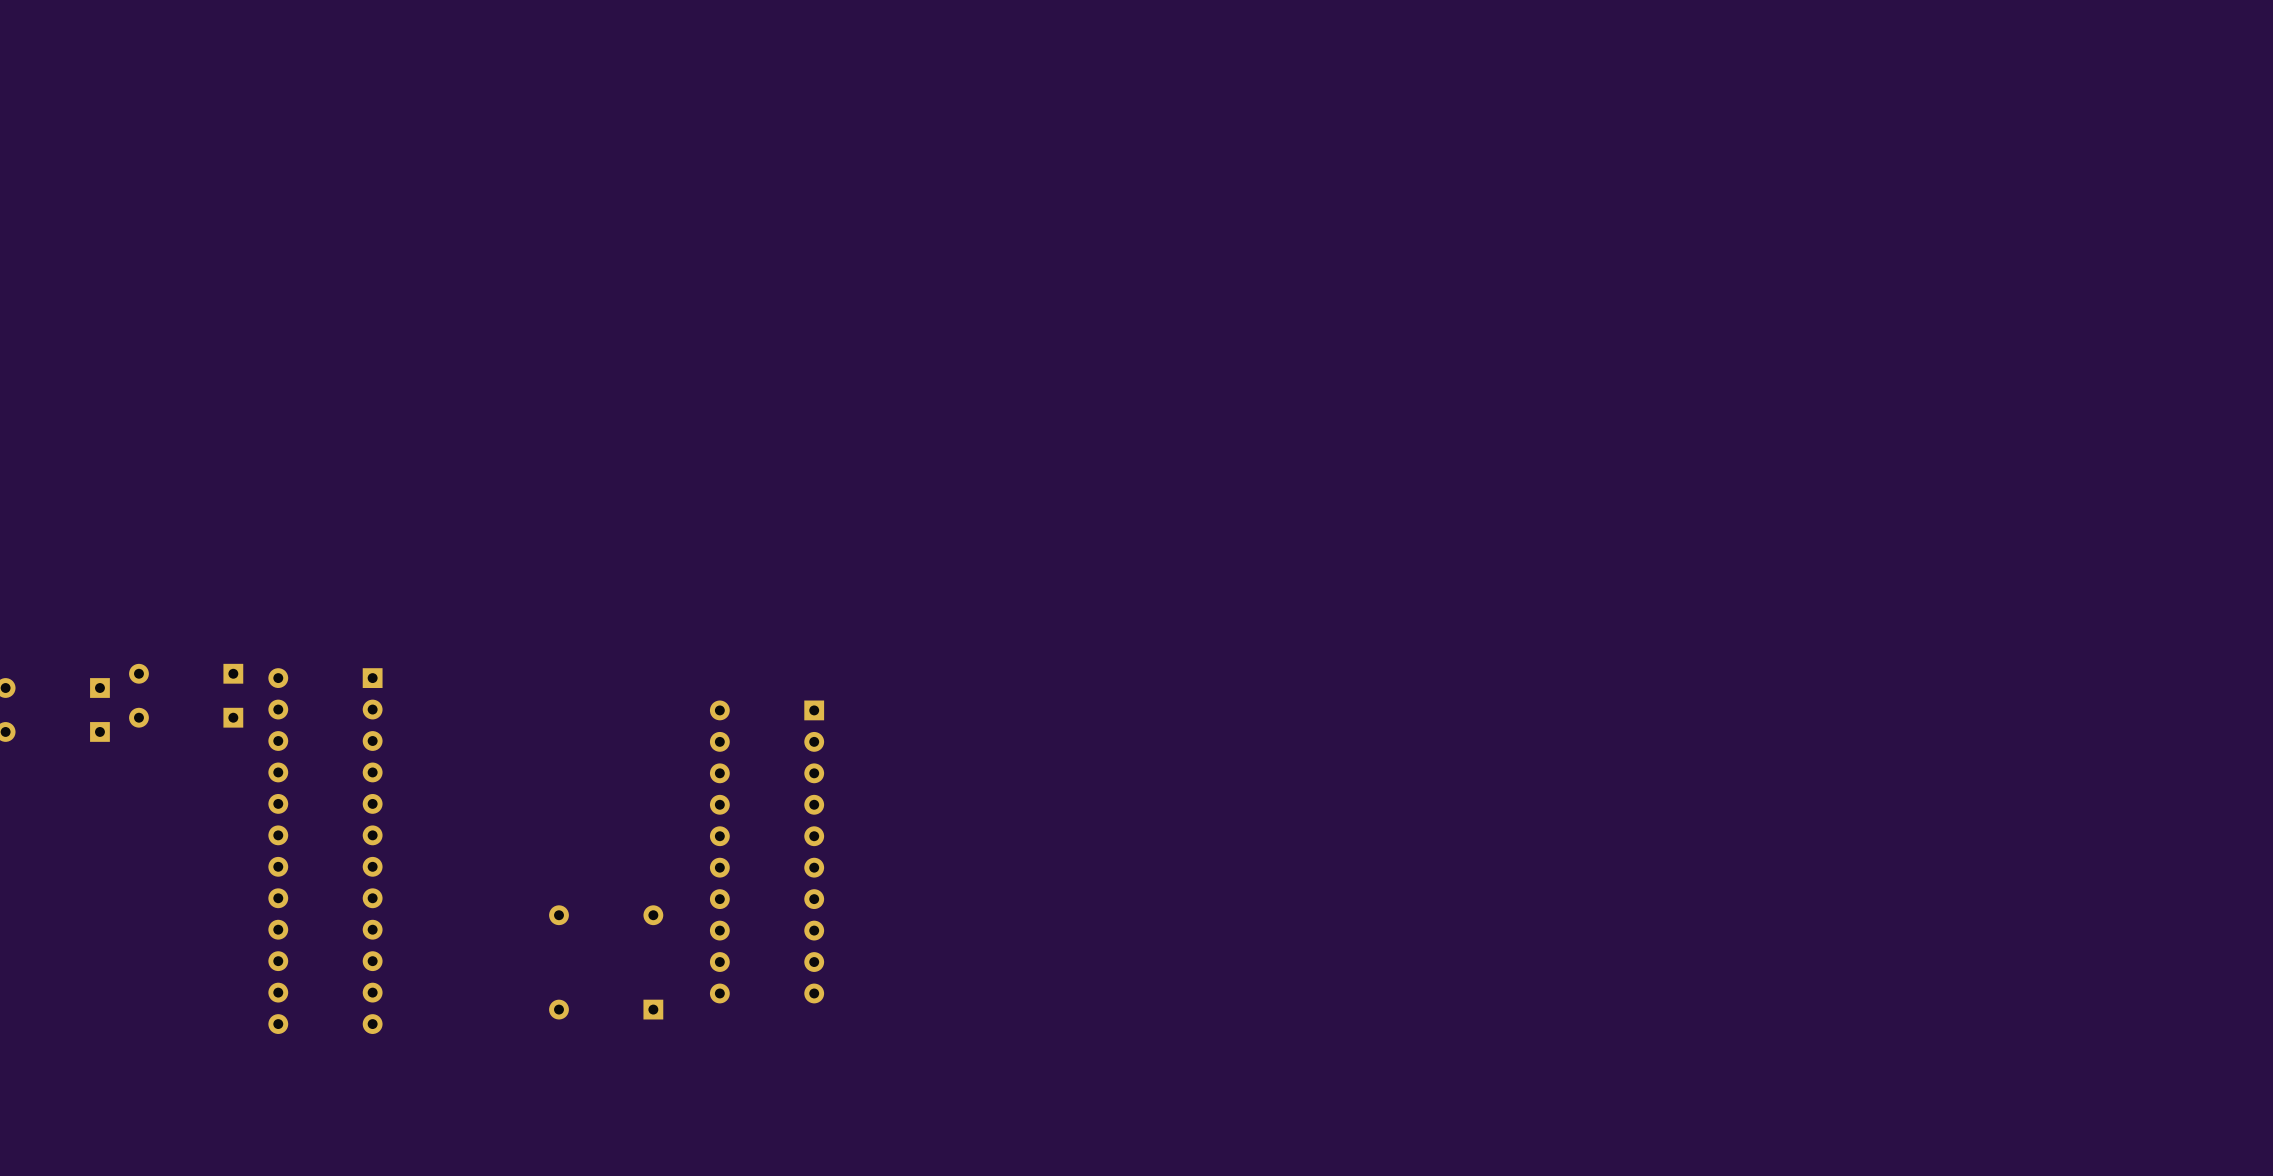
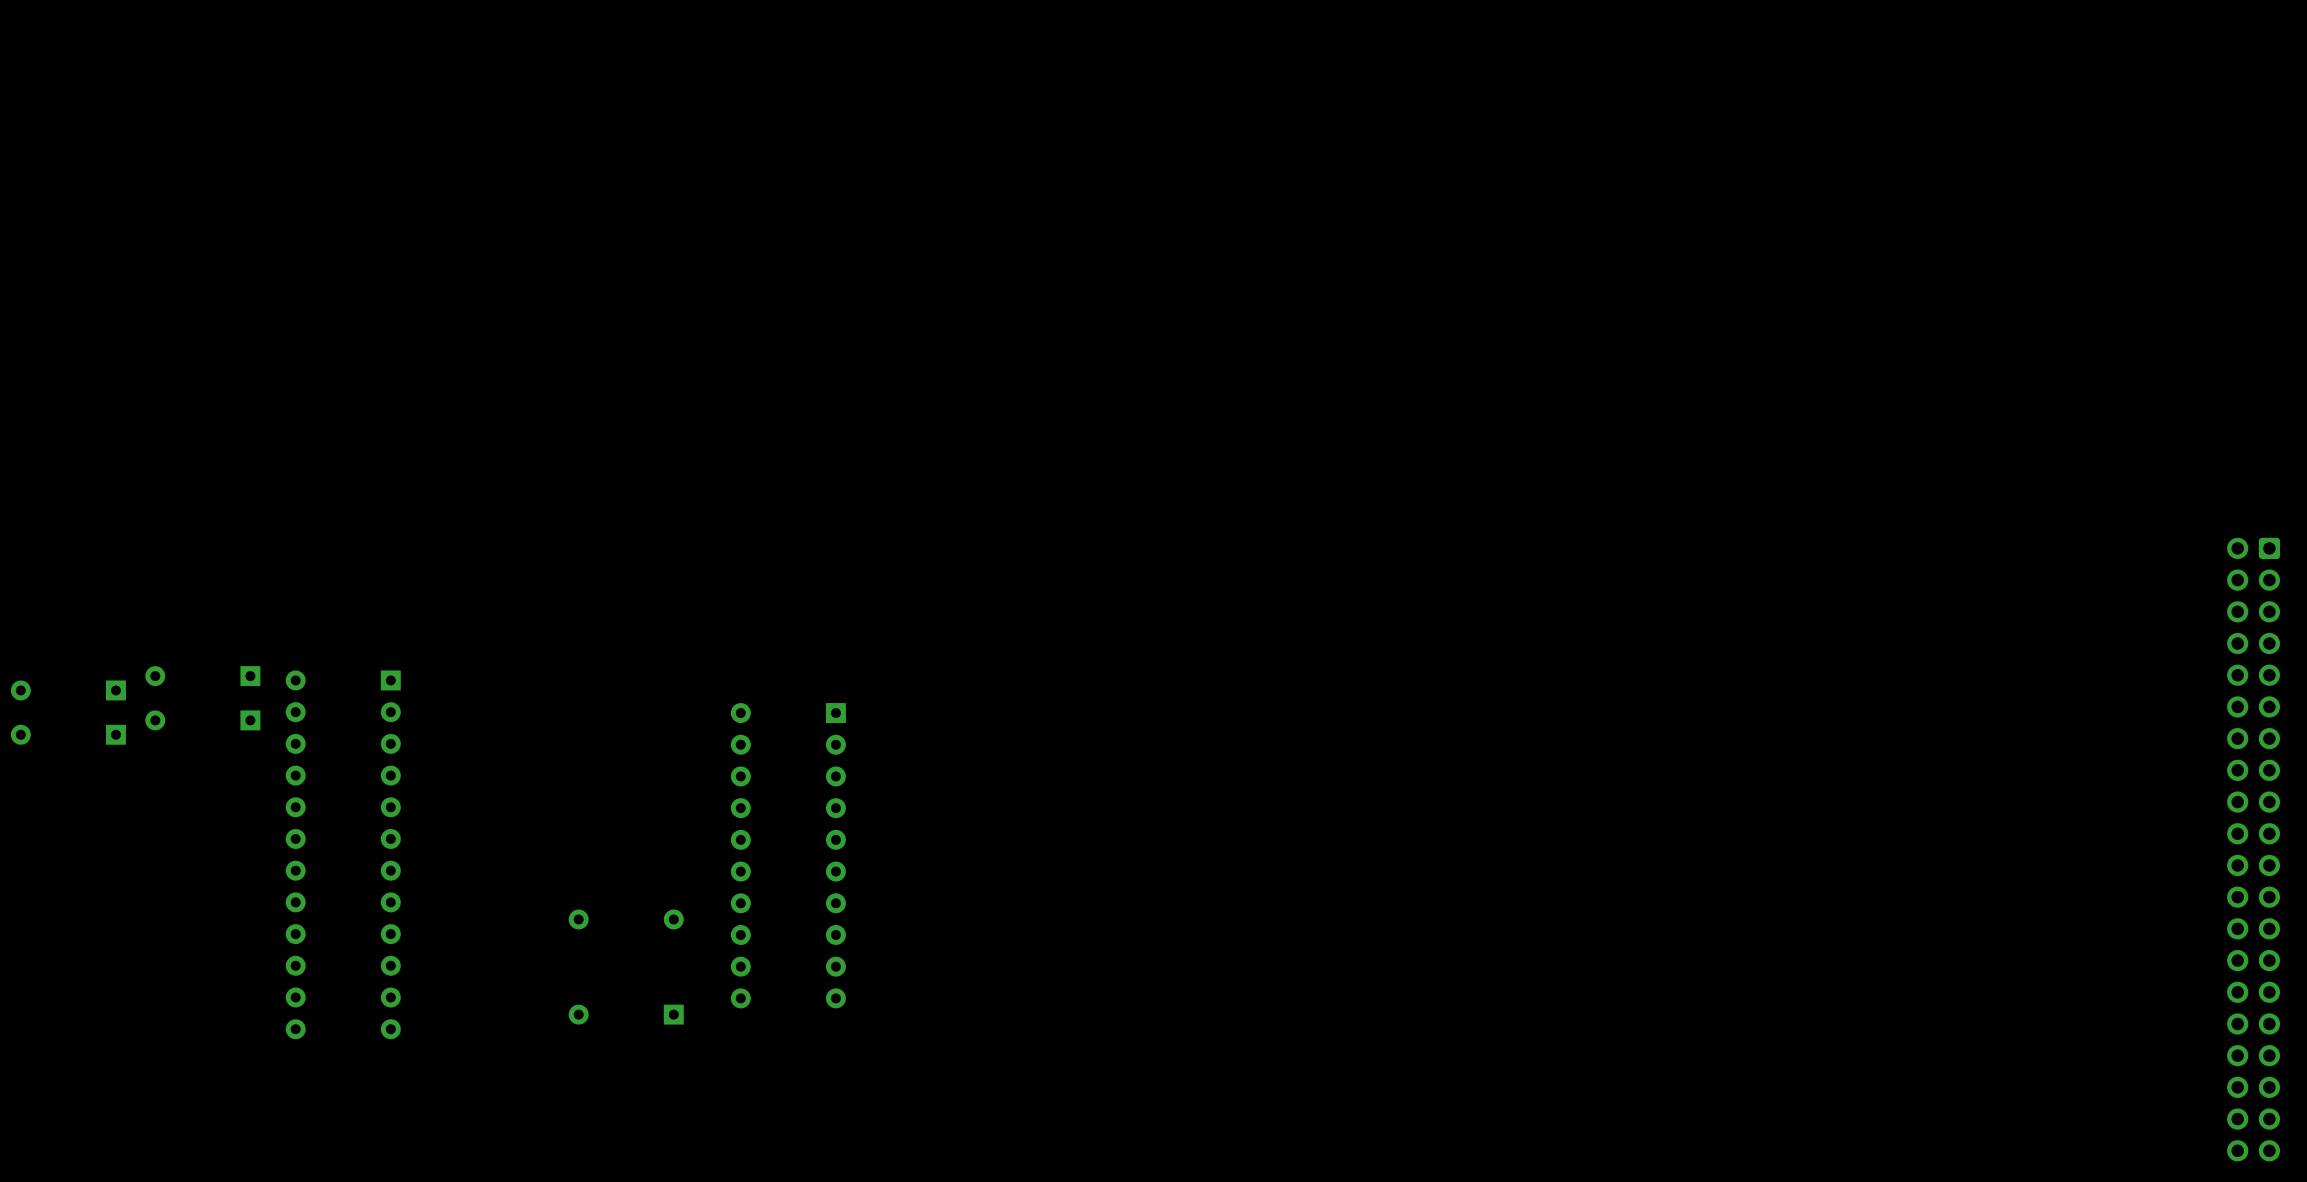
part: none -> (2253, 849)

